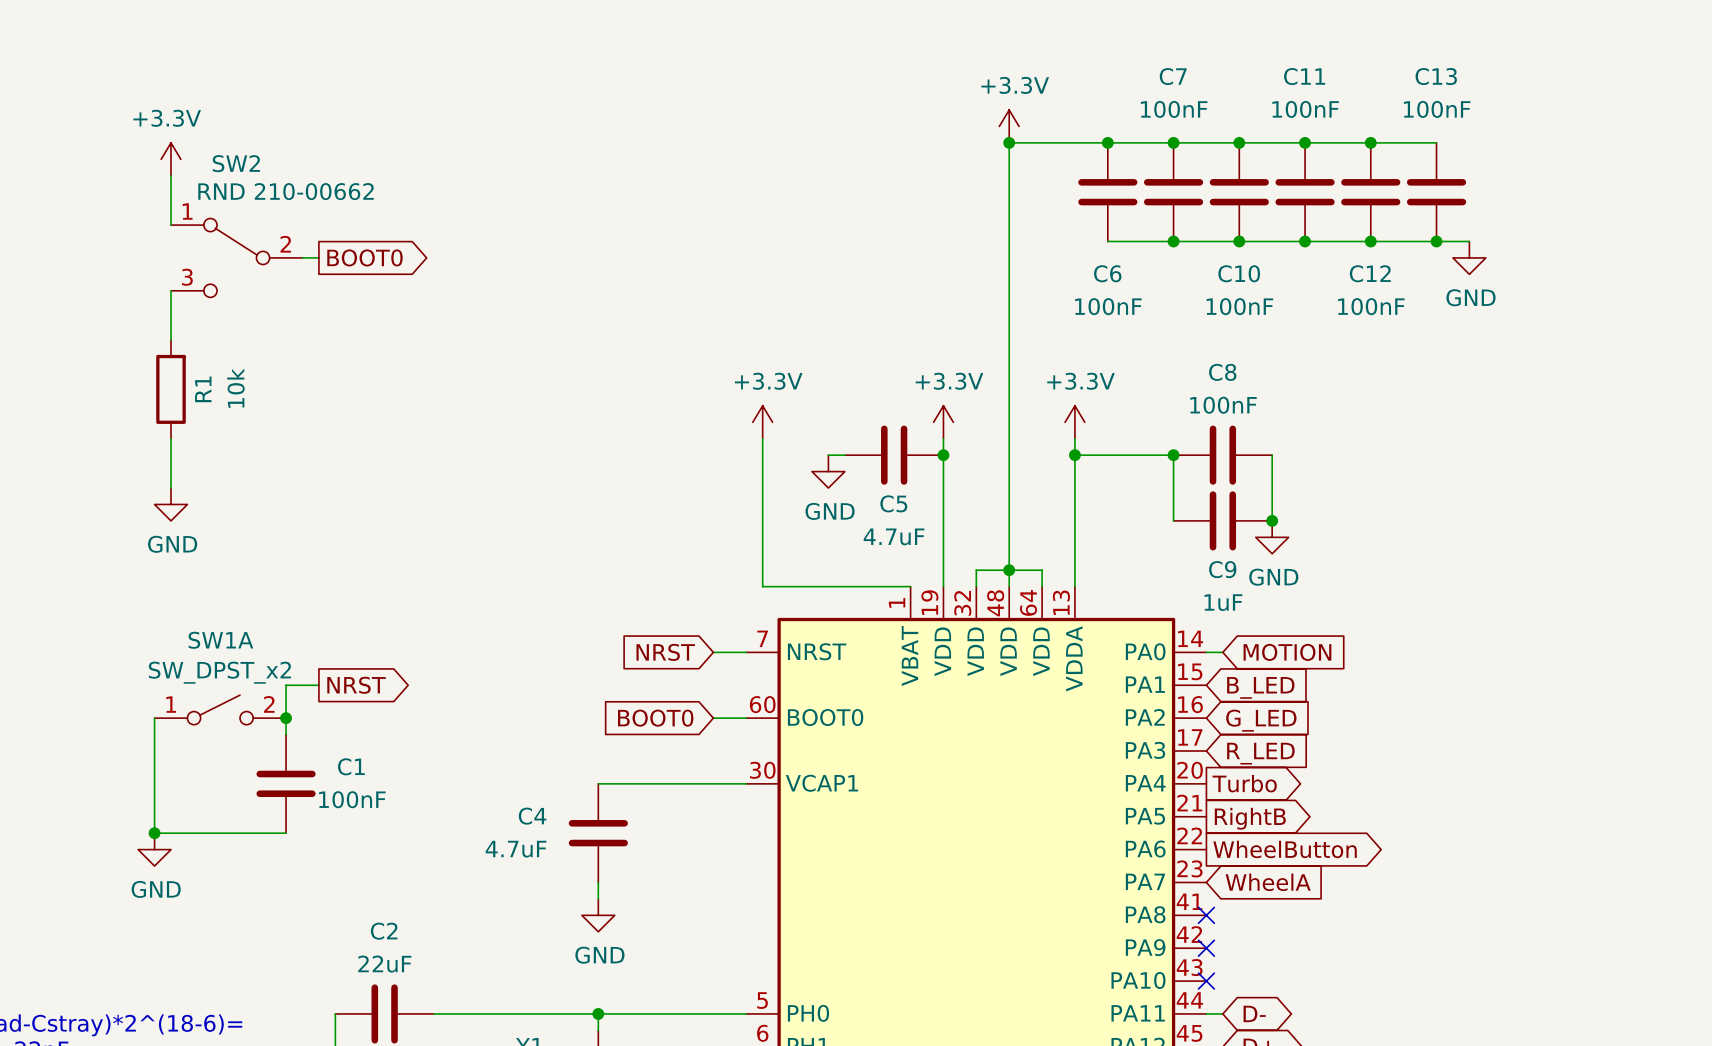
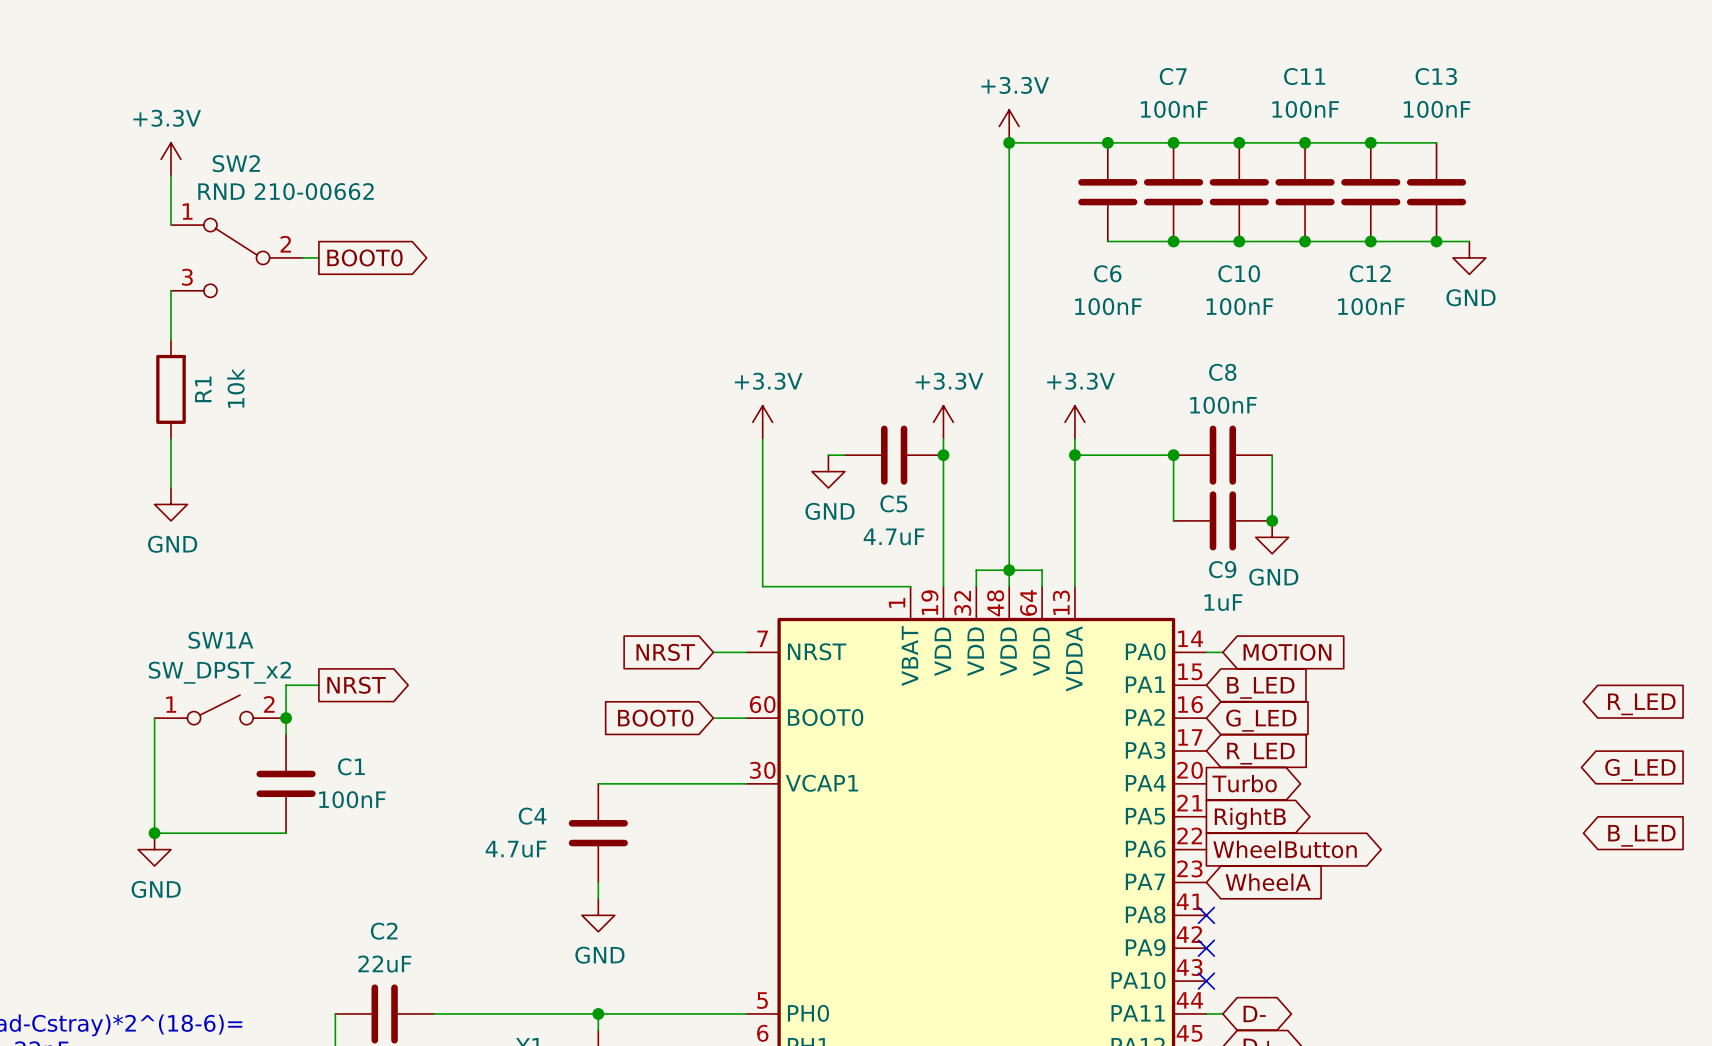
global label: none -> R_LED (1641, 704)
global label: none -> G_LED (1640, 769)
global label: none -> B_LED (1641, 835)

